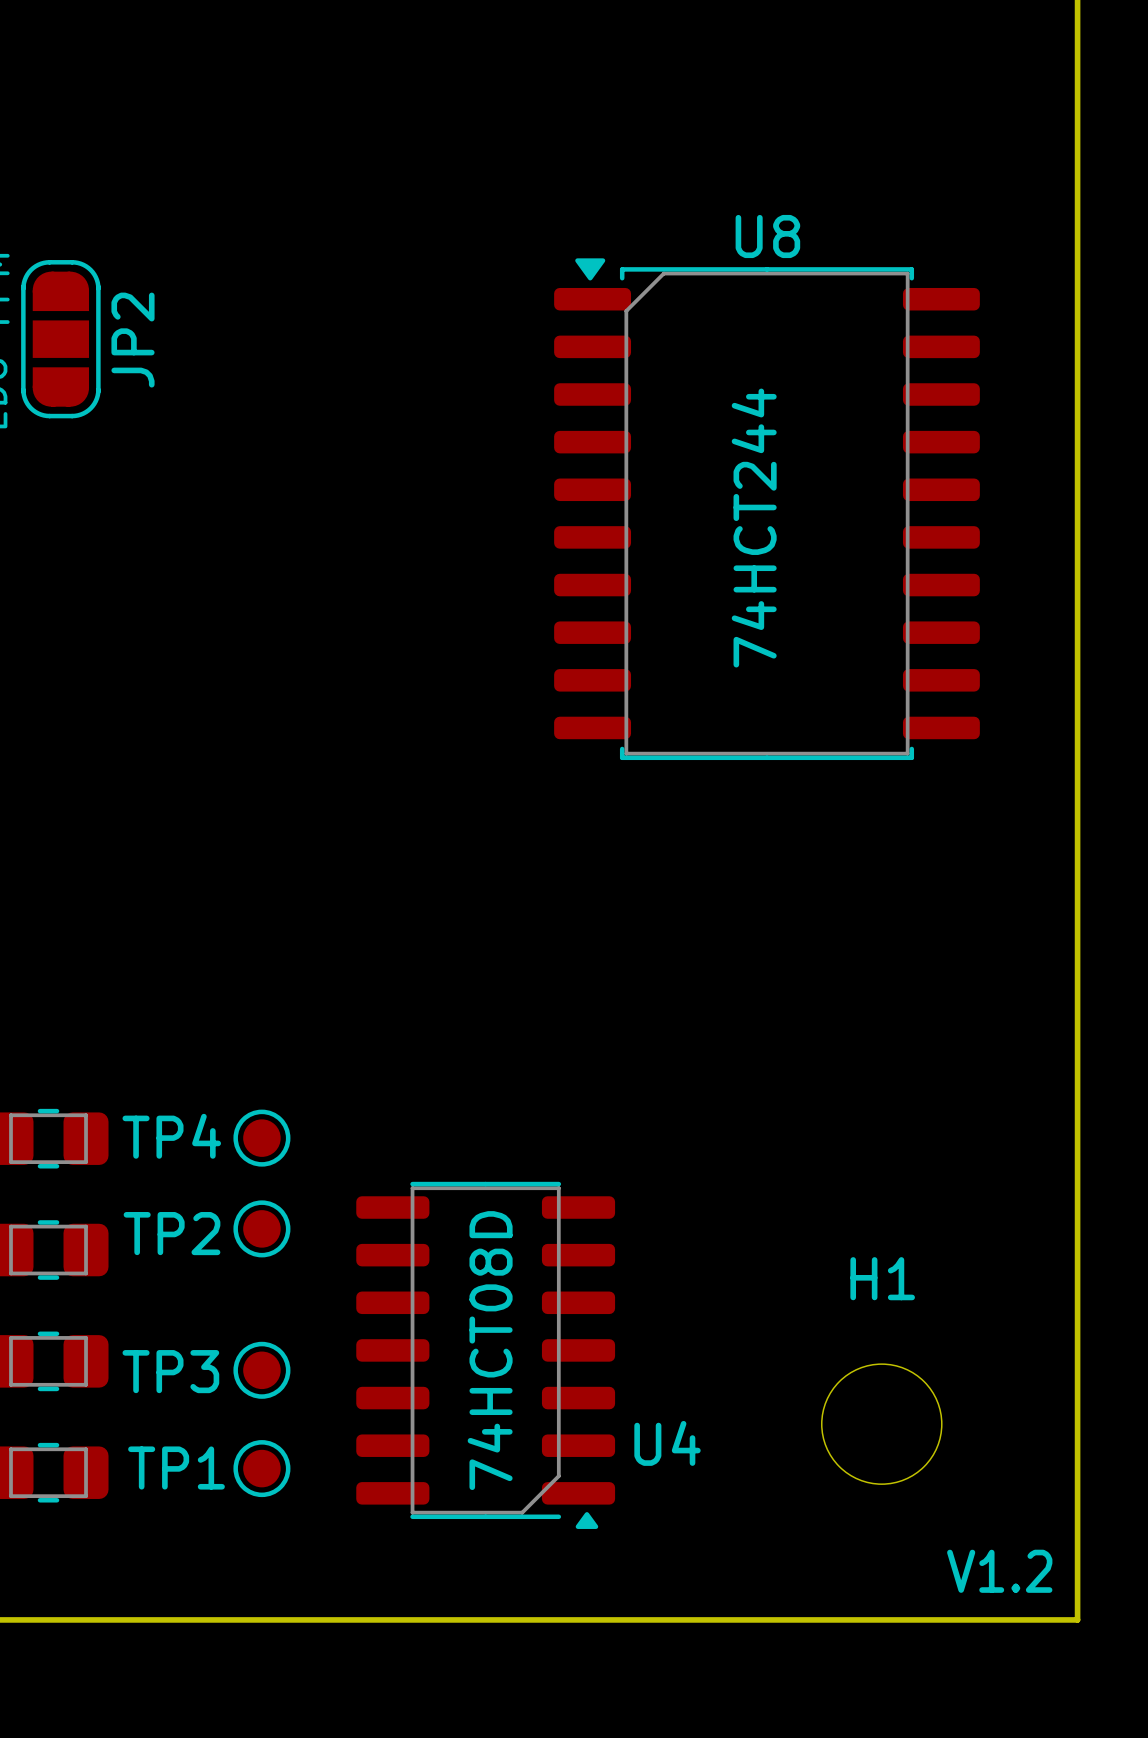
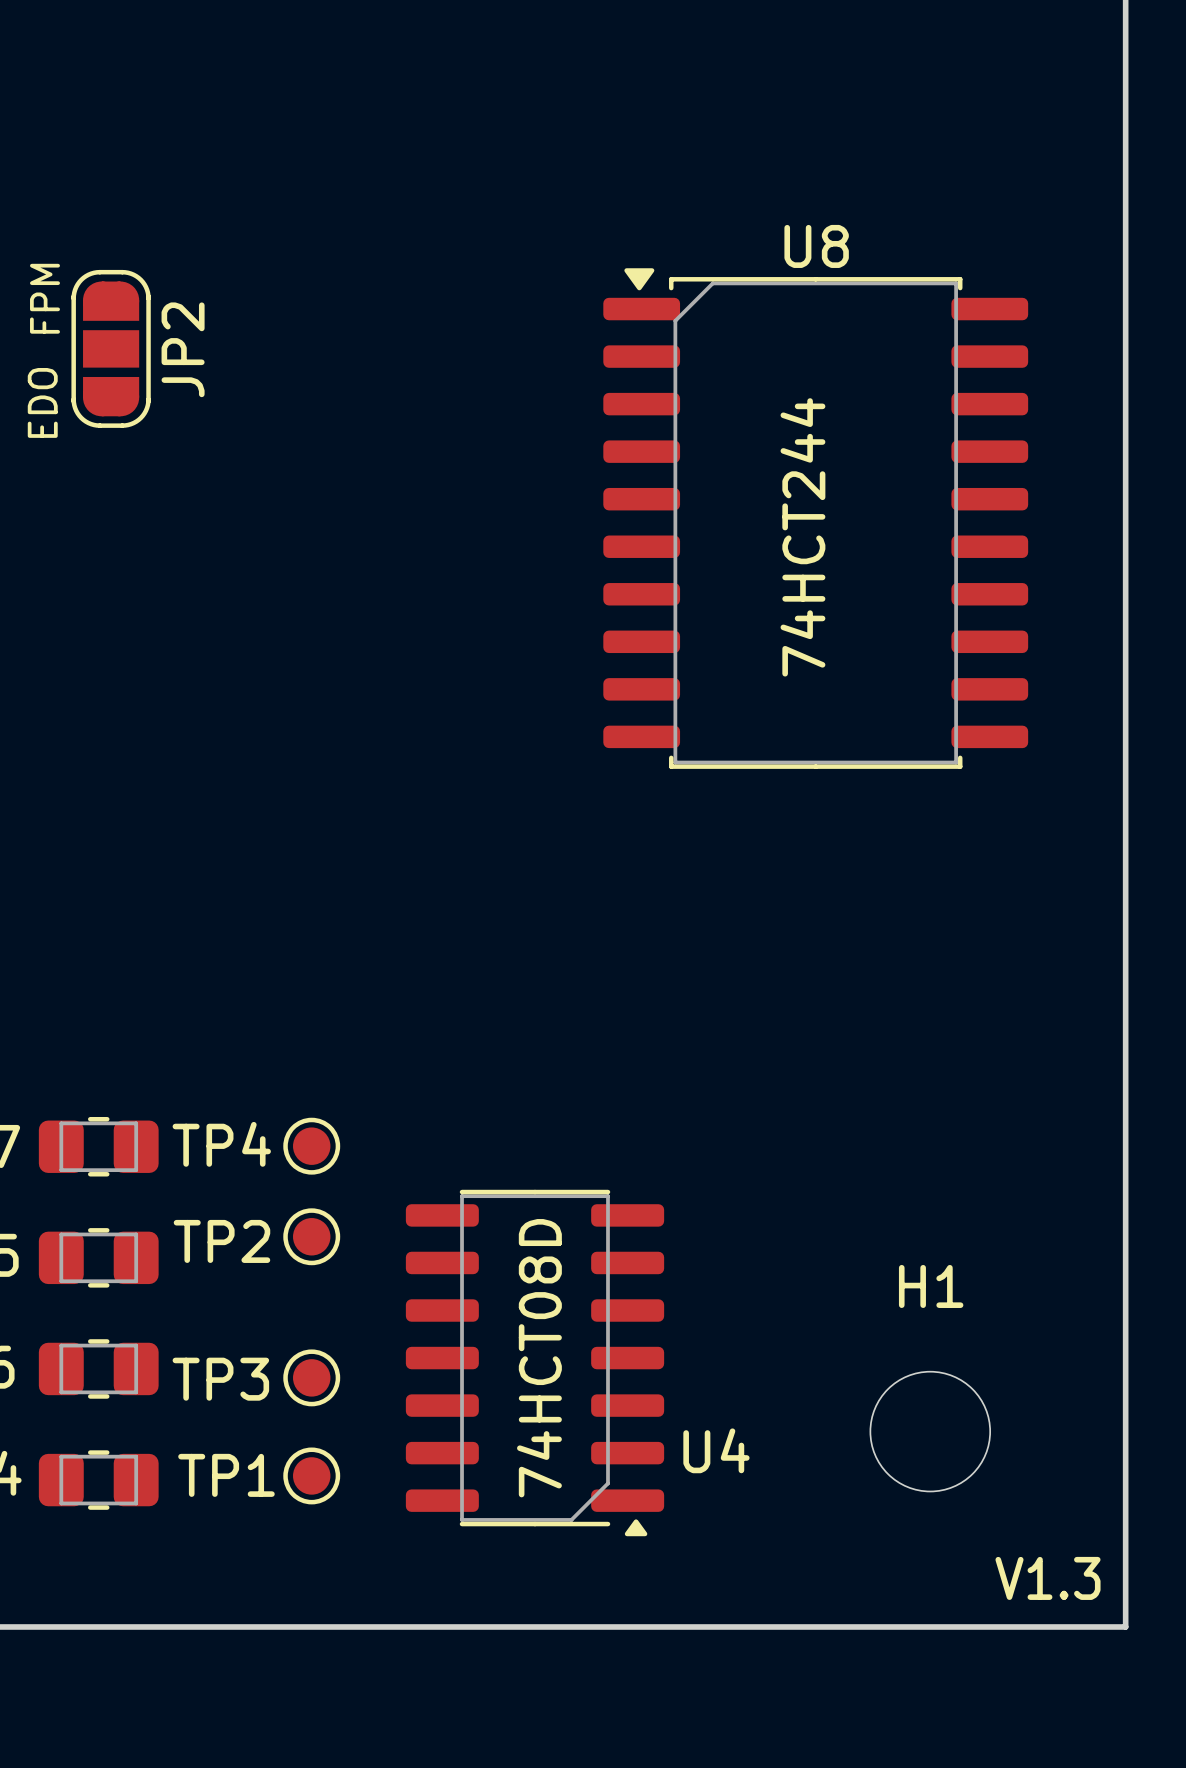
text: V1.2 (999, 1571) -> V1.3 (1048, 1578)

